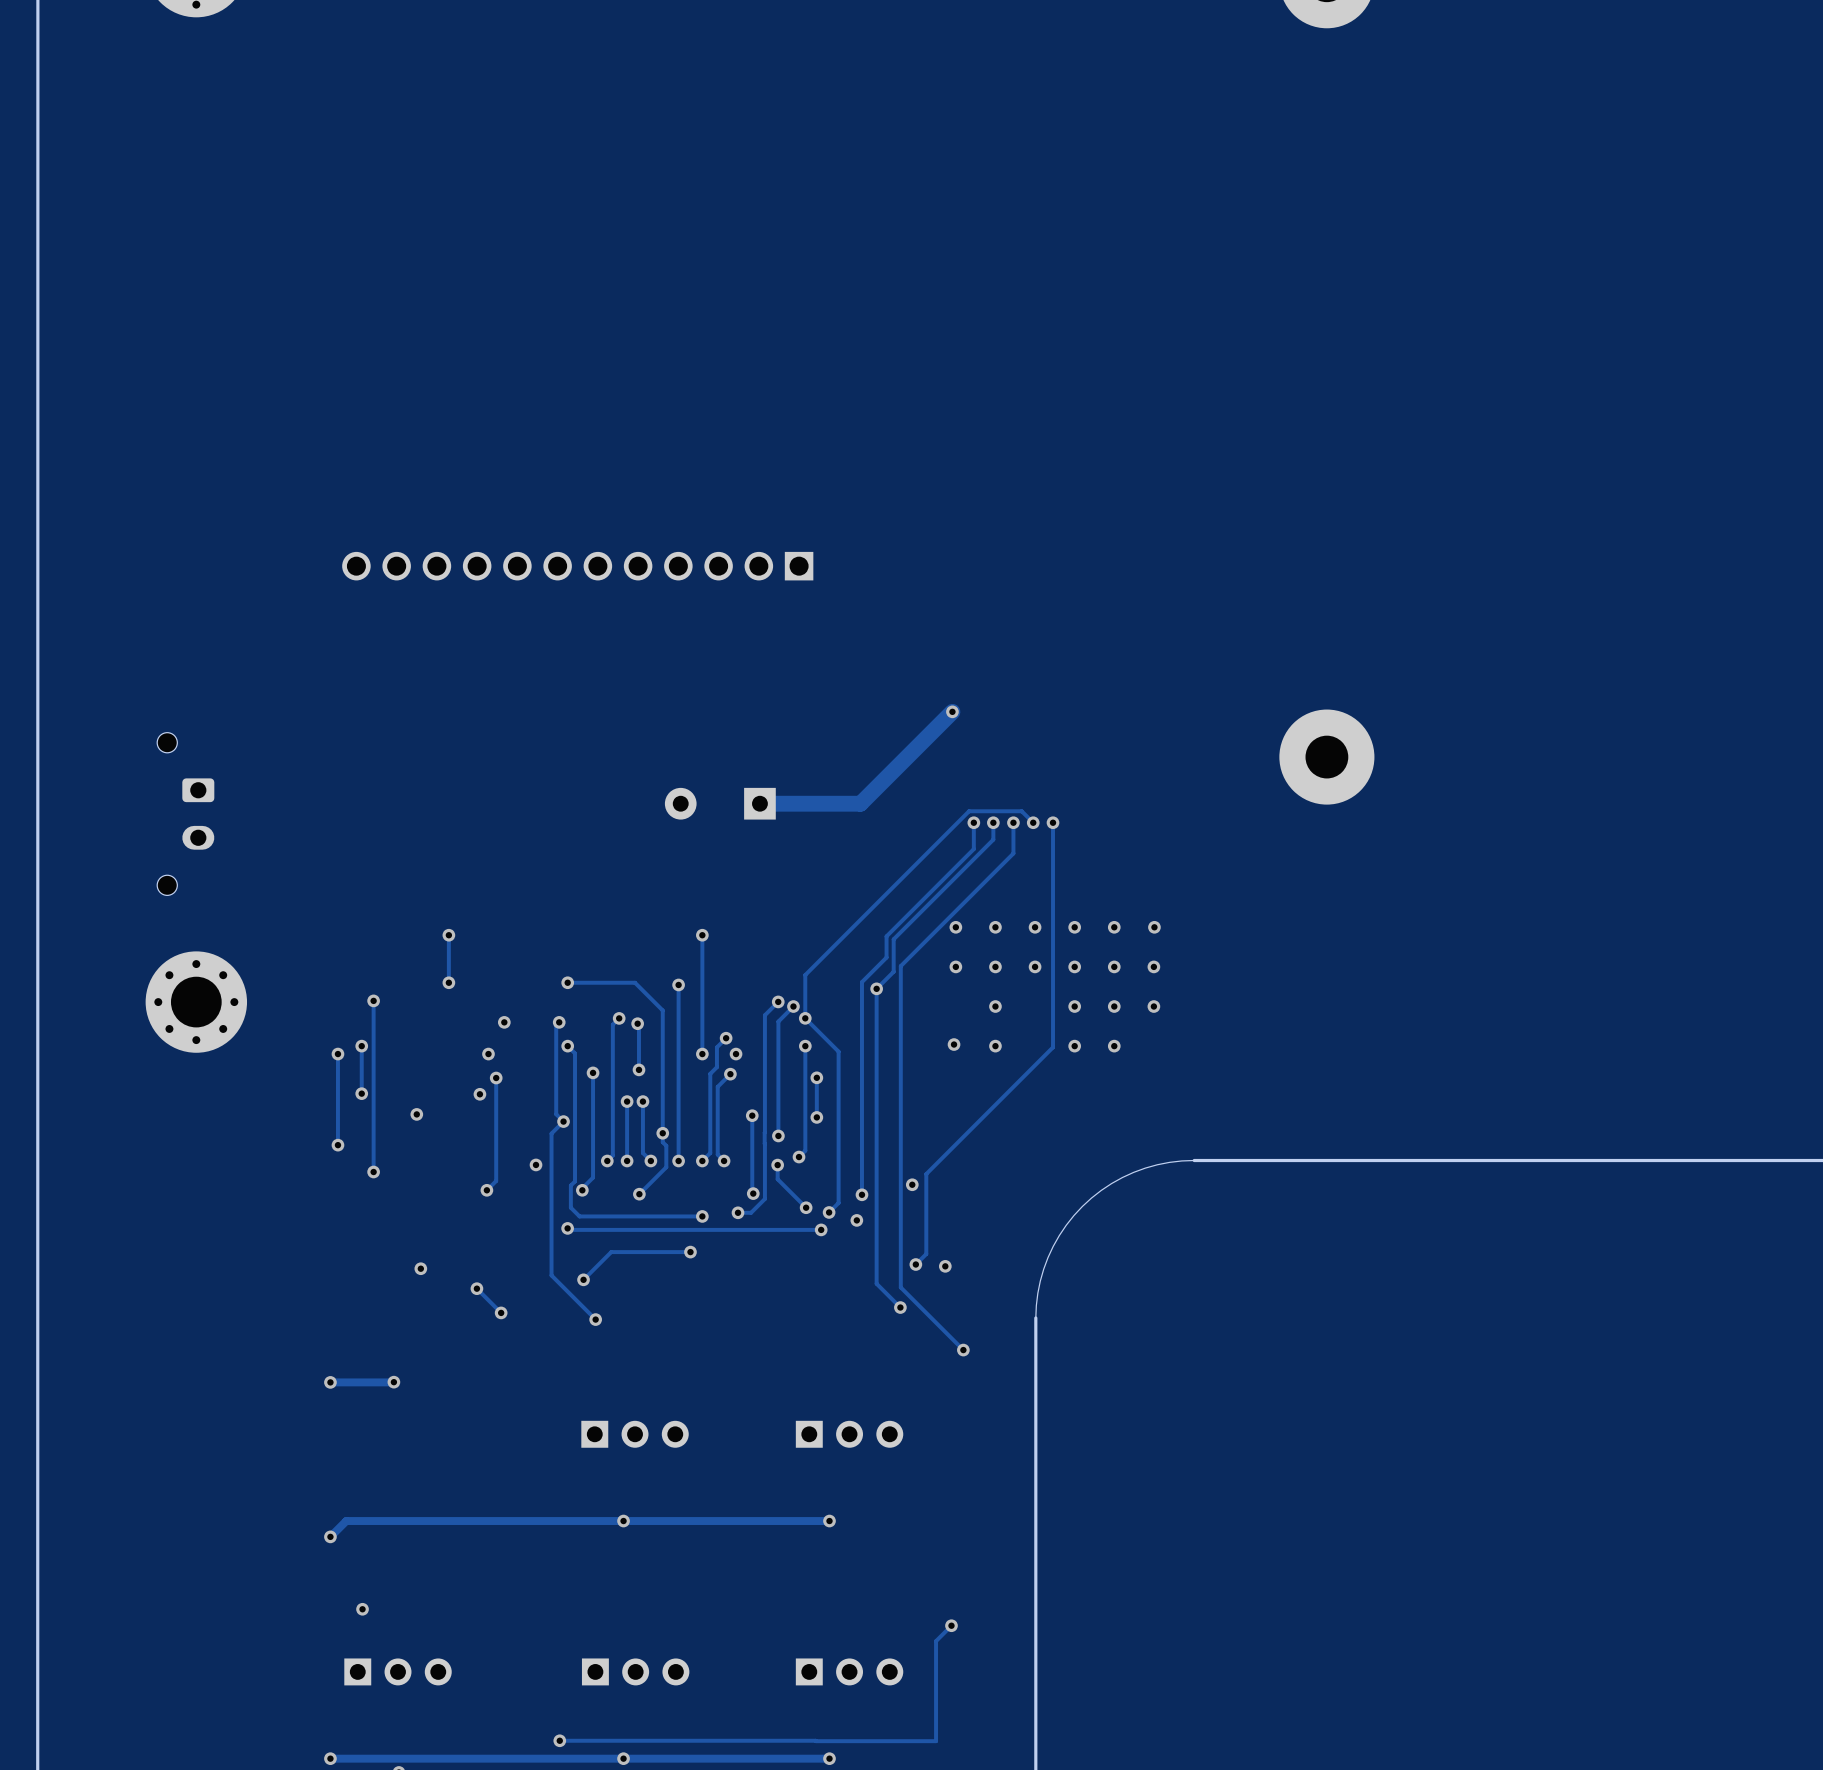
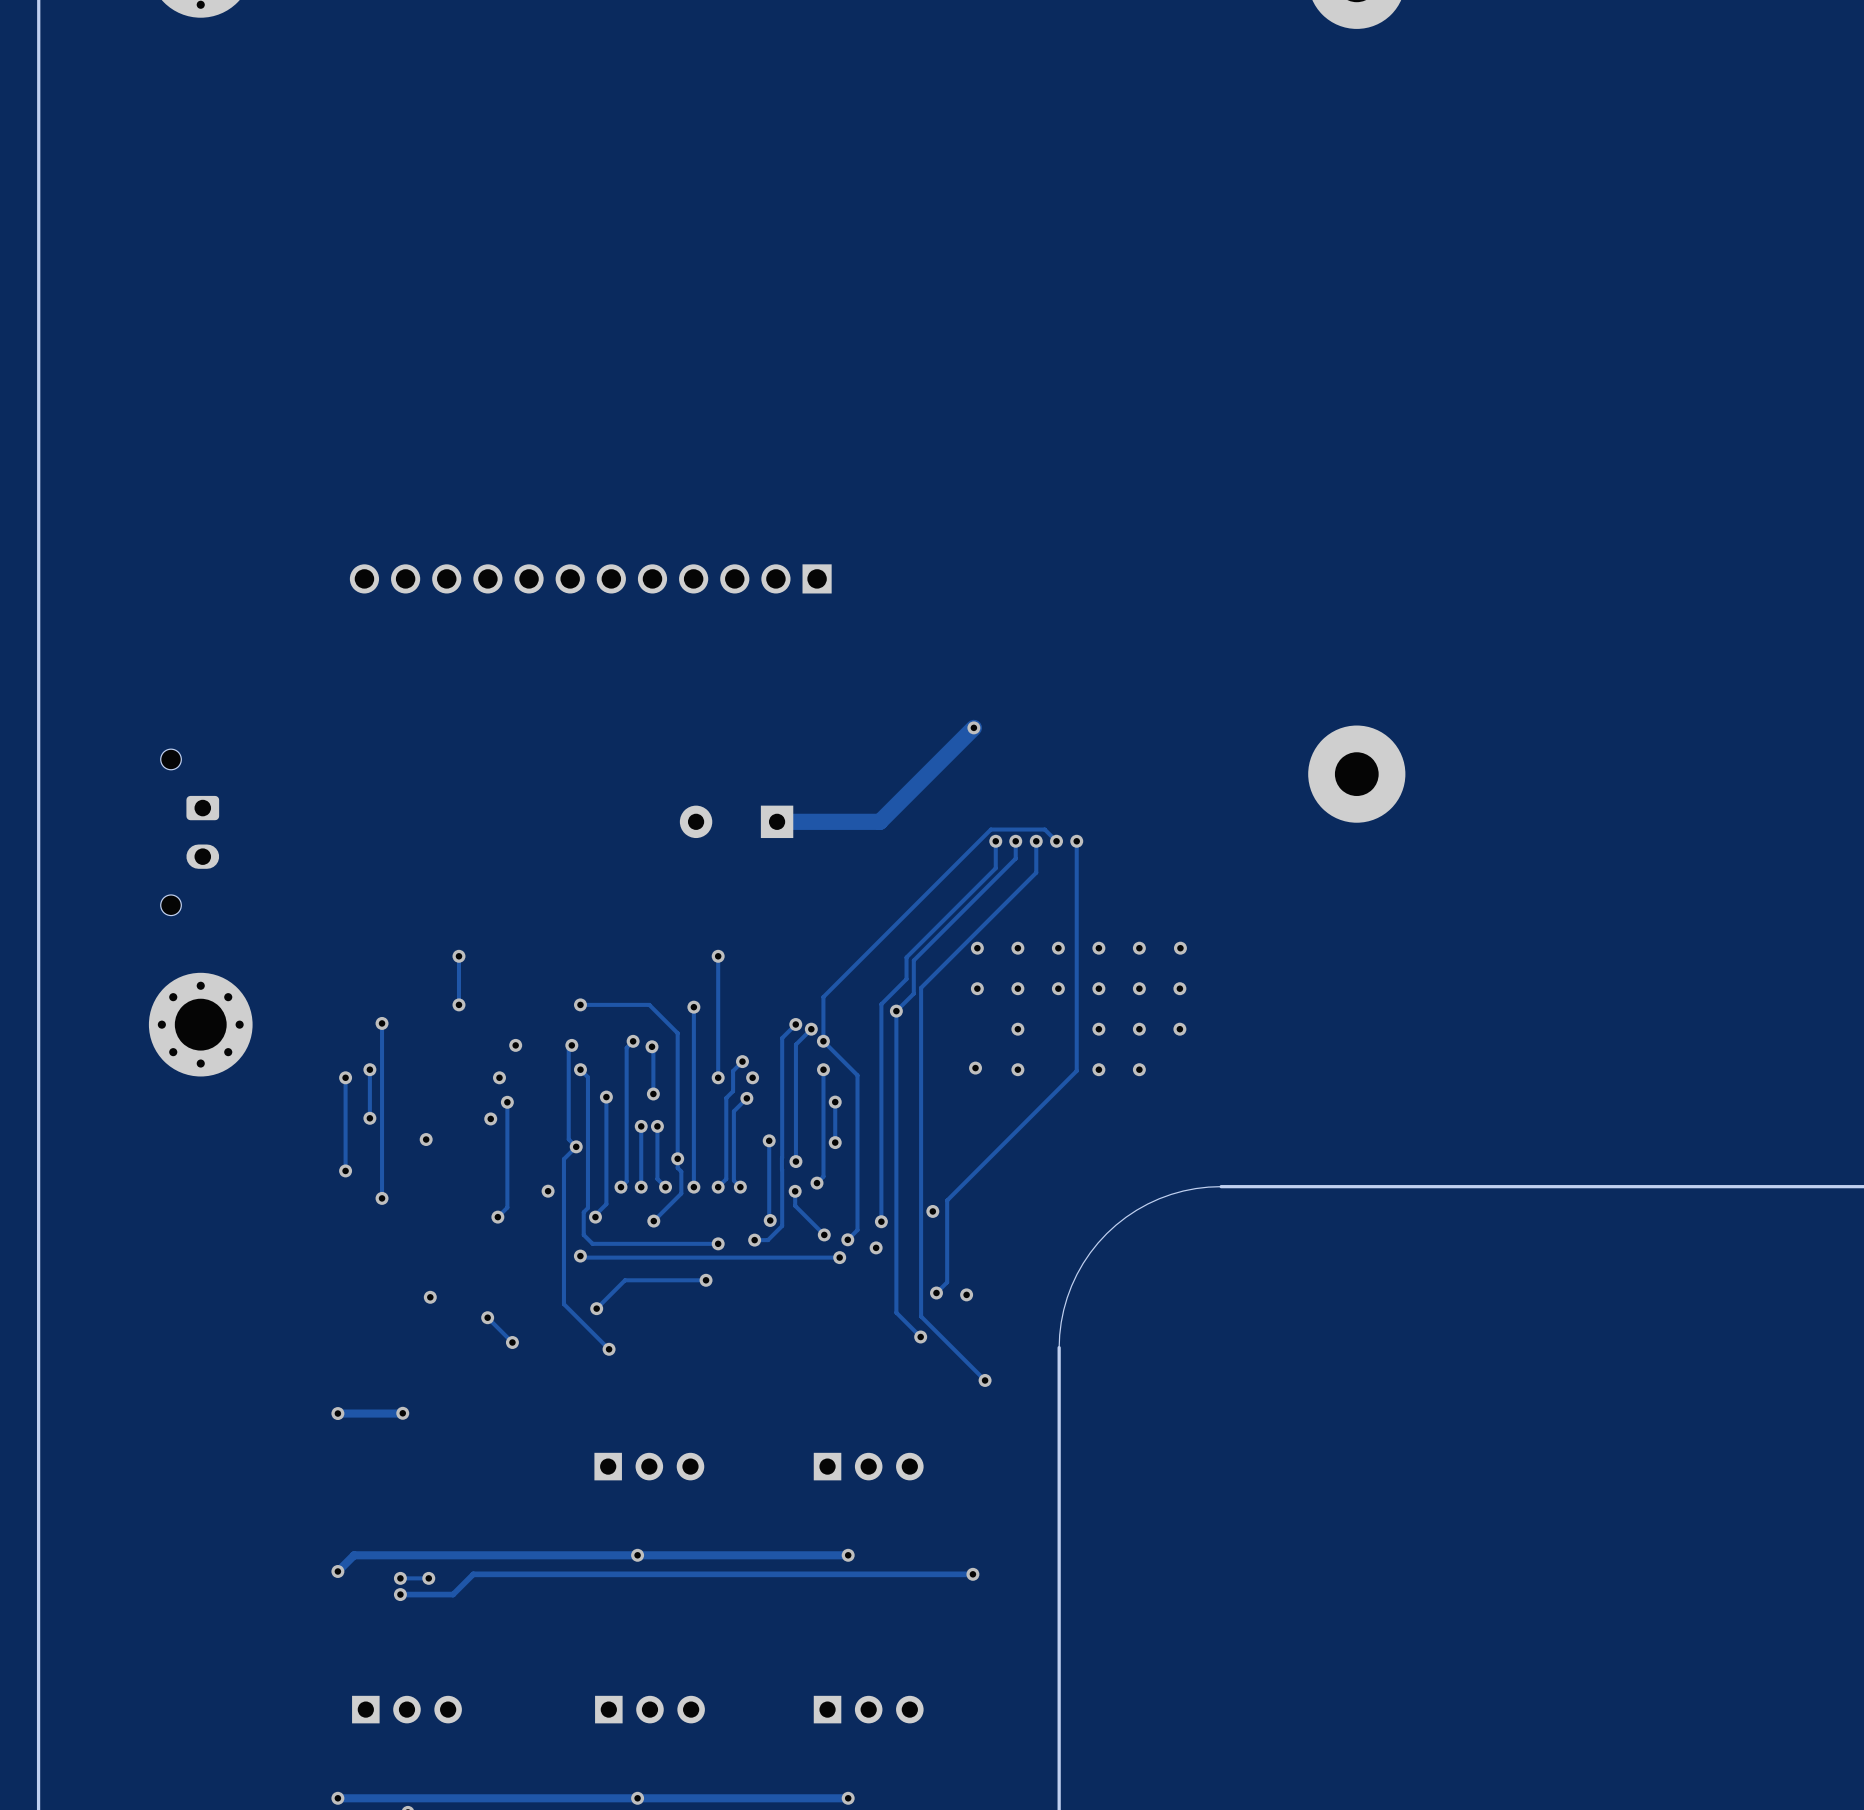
track: none -> (972, 1574) (473, 1574) (453, 1594) (400, 1594)
via: none -> (400, 1578)
track: none -> (428, 1578) (400, 1578)
via: none -> (428, 1578)
via: none -> (400, 1594)
via: (362, 1609) -> none
track: (951, 1625) (936, 1641) (936, 1741) (559, 1740) -> none
via position: (951, 1625) -> (972, 1574)
via: (559, 1740) -> none

